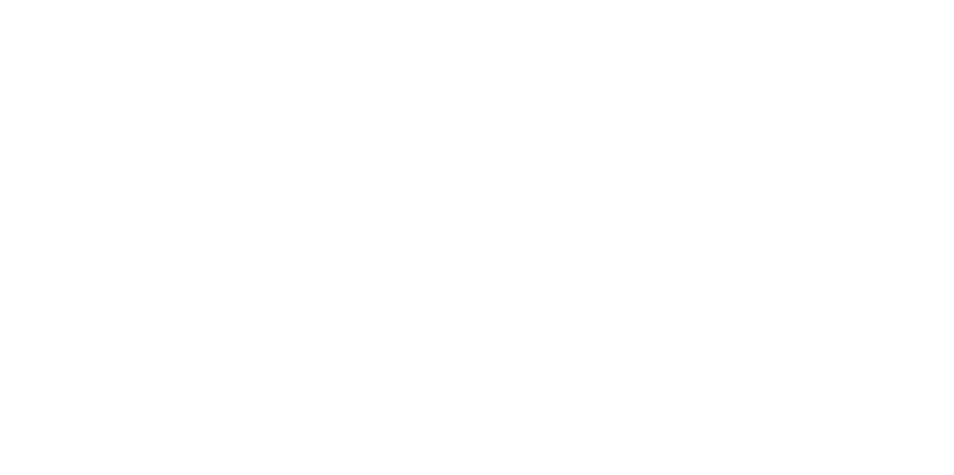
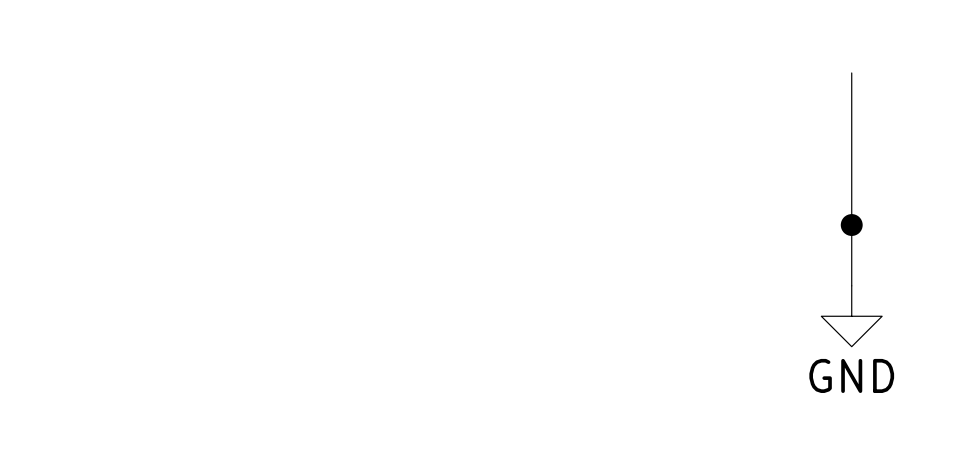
wire: none -> (851, 72) (851, 285)
junction: none -> (851, 225)
power symbol: none -> GND (851, 316)

